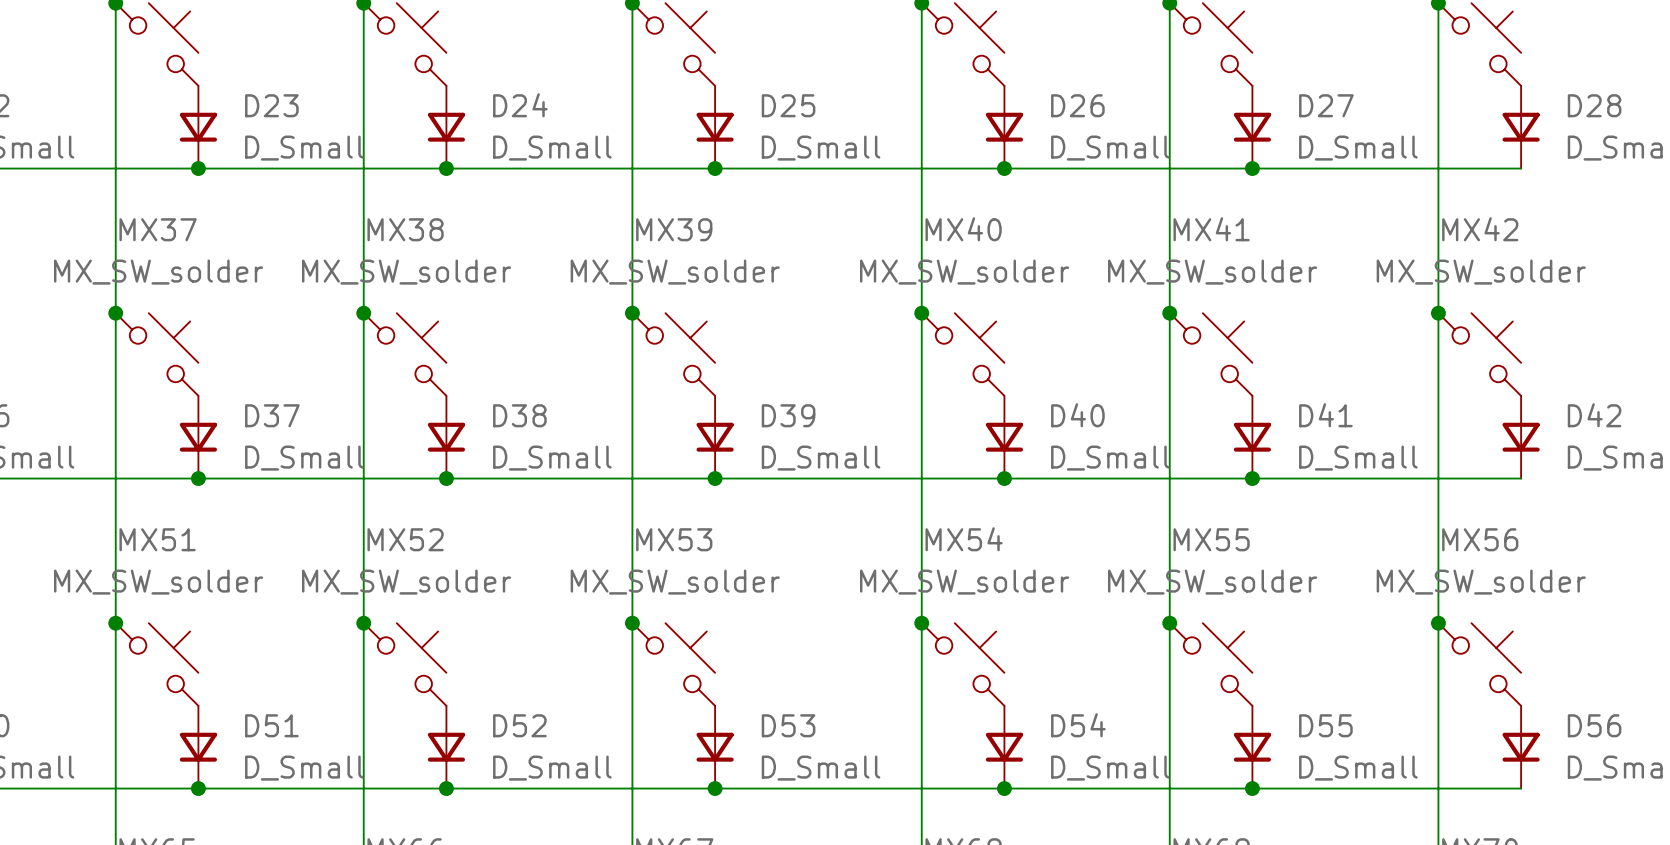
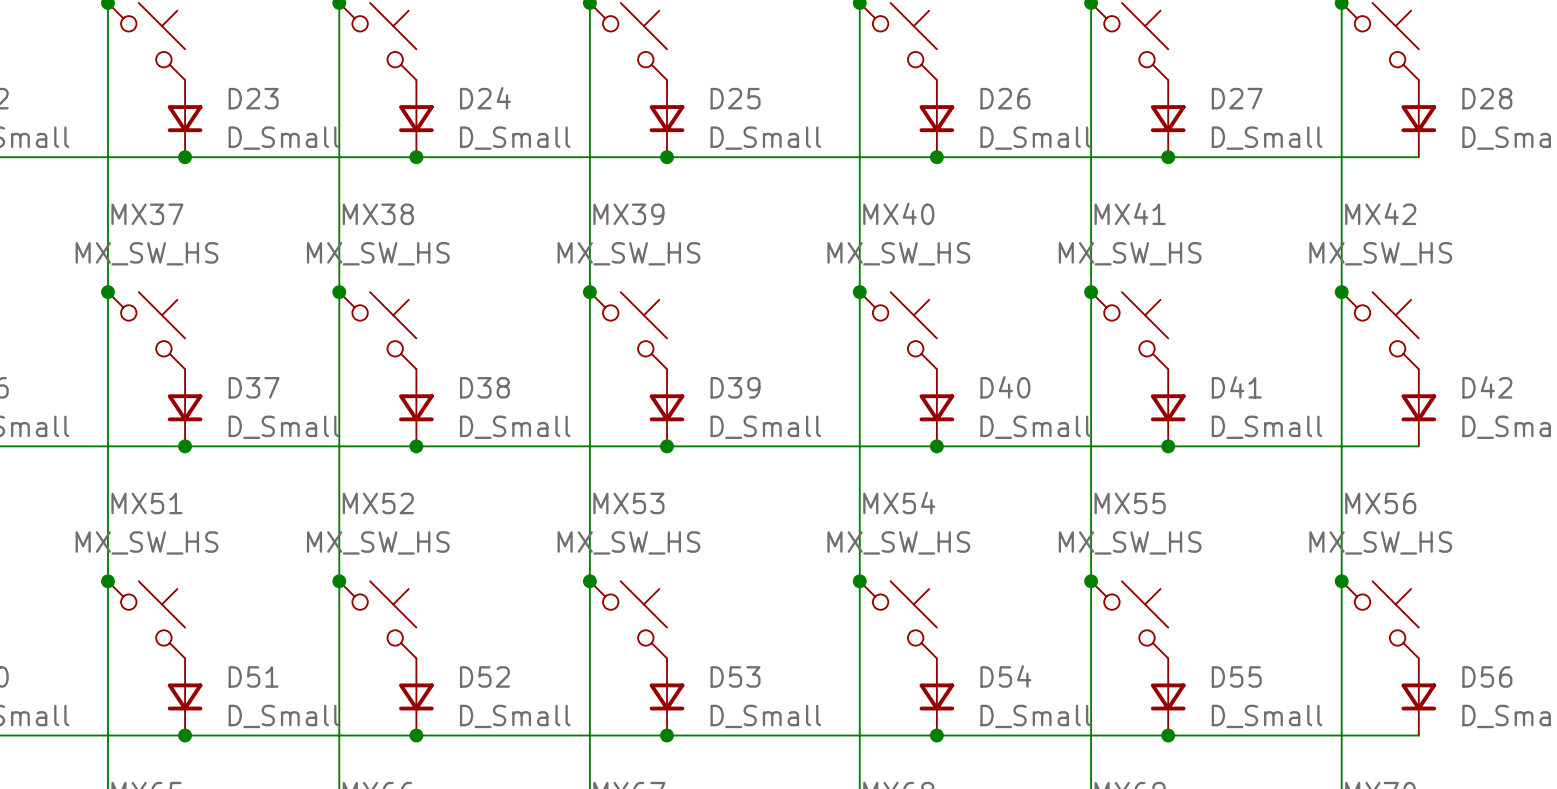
MX37 value: MX_SW_solder (158, 272) -> MX_SW_HS (146, 253)
MX38 value: MX_SW_solder (406, 272) -> MX_SW_HS (378, 253)
MX39 value: MX_SW_solder (675, 272) -> MX_SW_HS (628, 253)
MX40 value: MX_SW_solder (964, 272) -> MX_SW_HS (898, 253)
MX41 value: MX_SW_solder (1212, 272) -> MX_SW_HS (1130, 253)
MX42 value: MX_SW_solder (1481, 272) -> MX_SW_HS (1380, 253)
MX51 value: MX_SW_solder (158, 582) -> MX_SW_HS (146, 542)
MX52 value: MX_SW_solder (406, 582) -> MX_SW_HS (378, 542)
MX53 value: MX_SW_solder (675, 582) -> MX_SW_HS (628, 542)
MX54 value: MX_SW_solder (964, 582) -> MX_SW_HS (898, 542)
MX55 value: MX_SW_solder (1212, 582) -> MX_SW_HS (1130, 542)
MX56 value: MX_SW_solder (1481, 582) -> MX_SW_HS (1380, 542)

